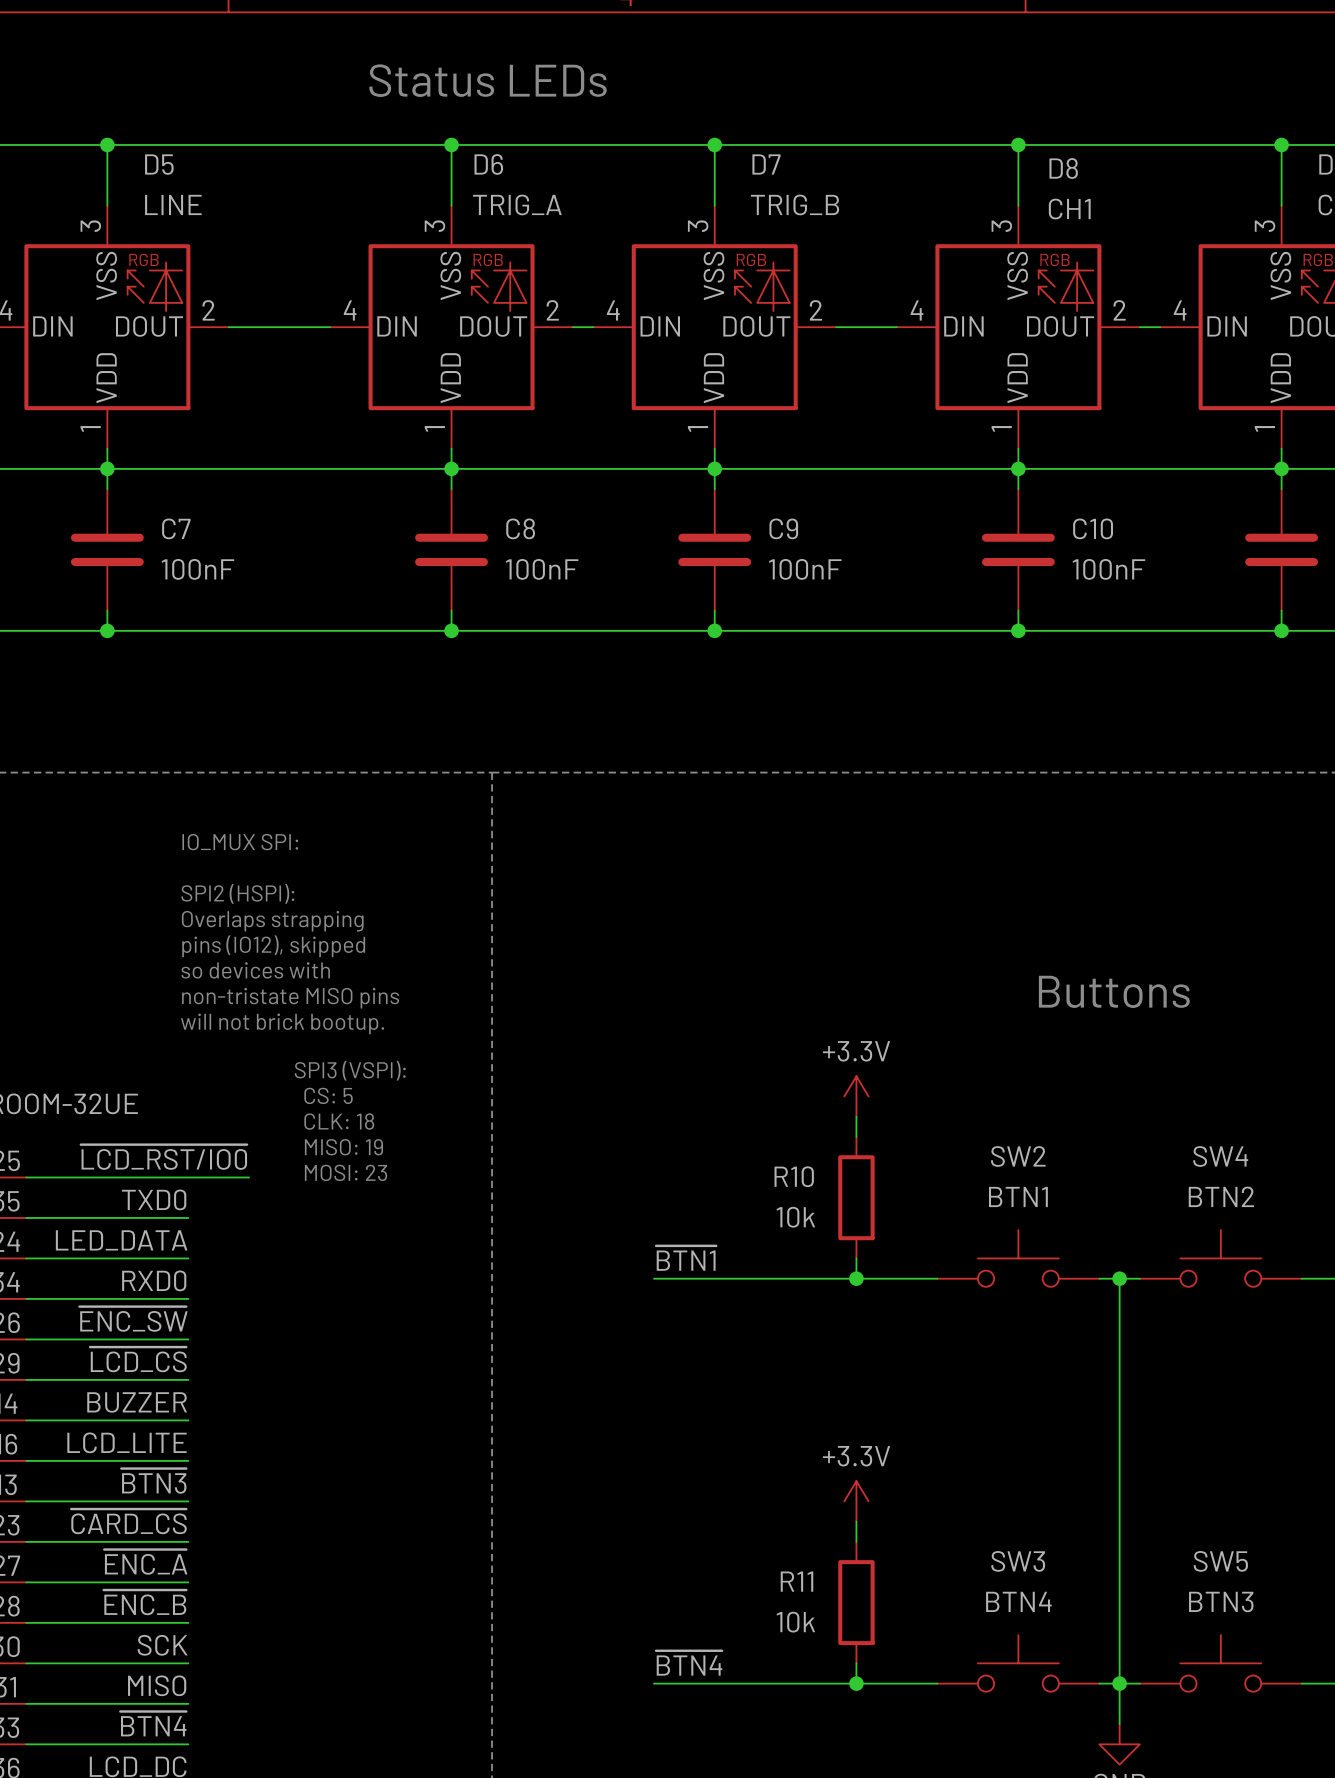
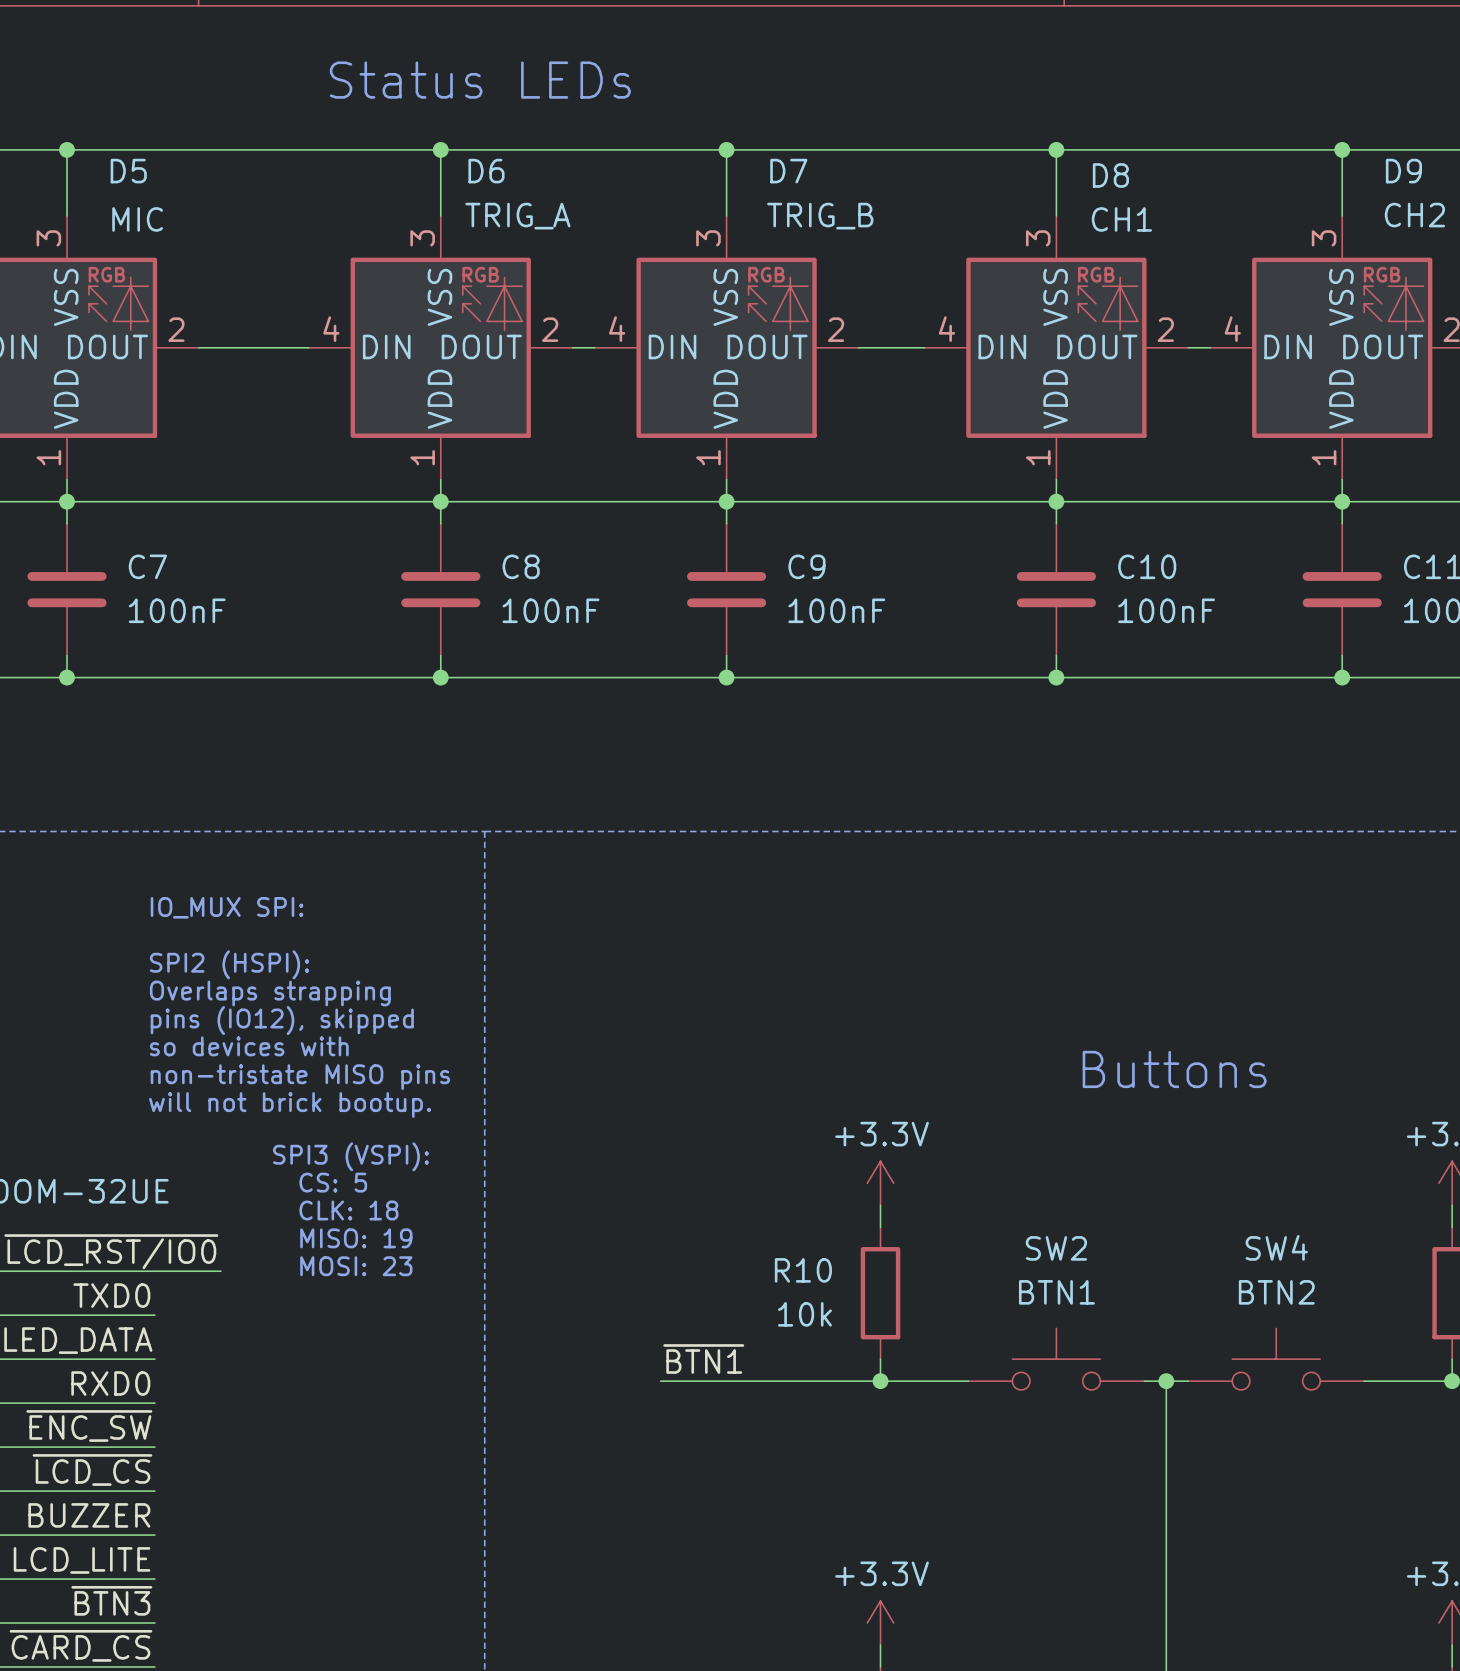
D5 value: LINE (173, 204) -> MIC (137, 219)

